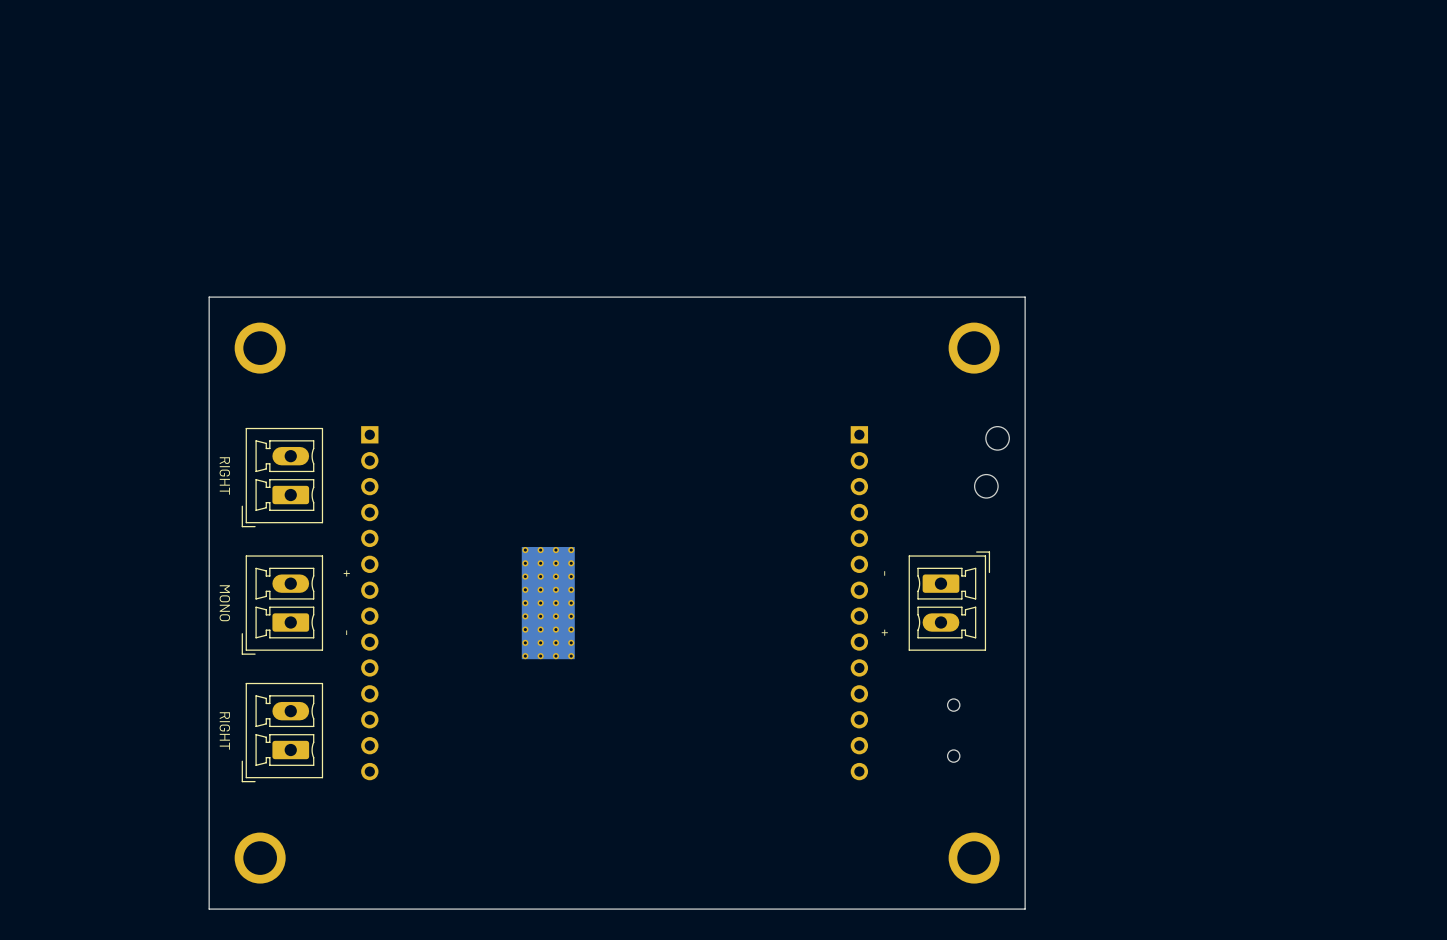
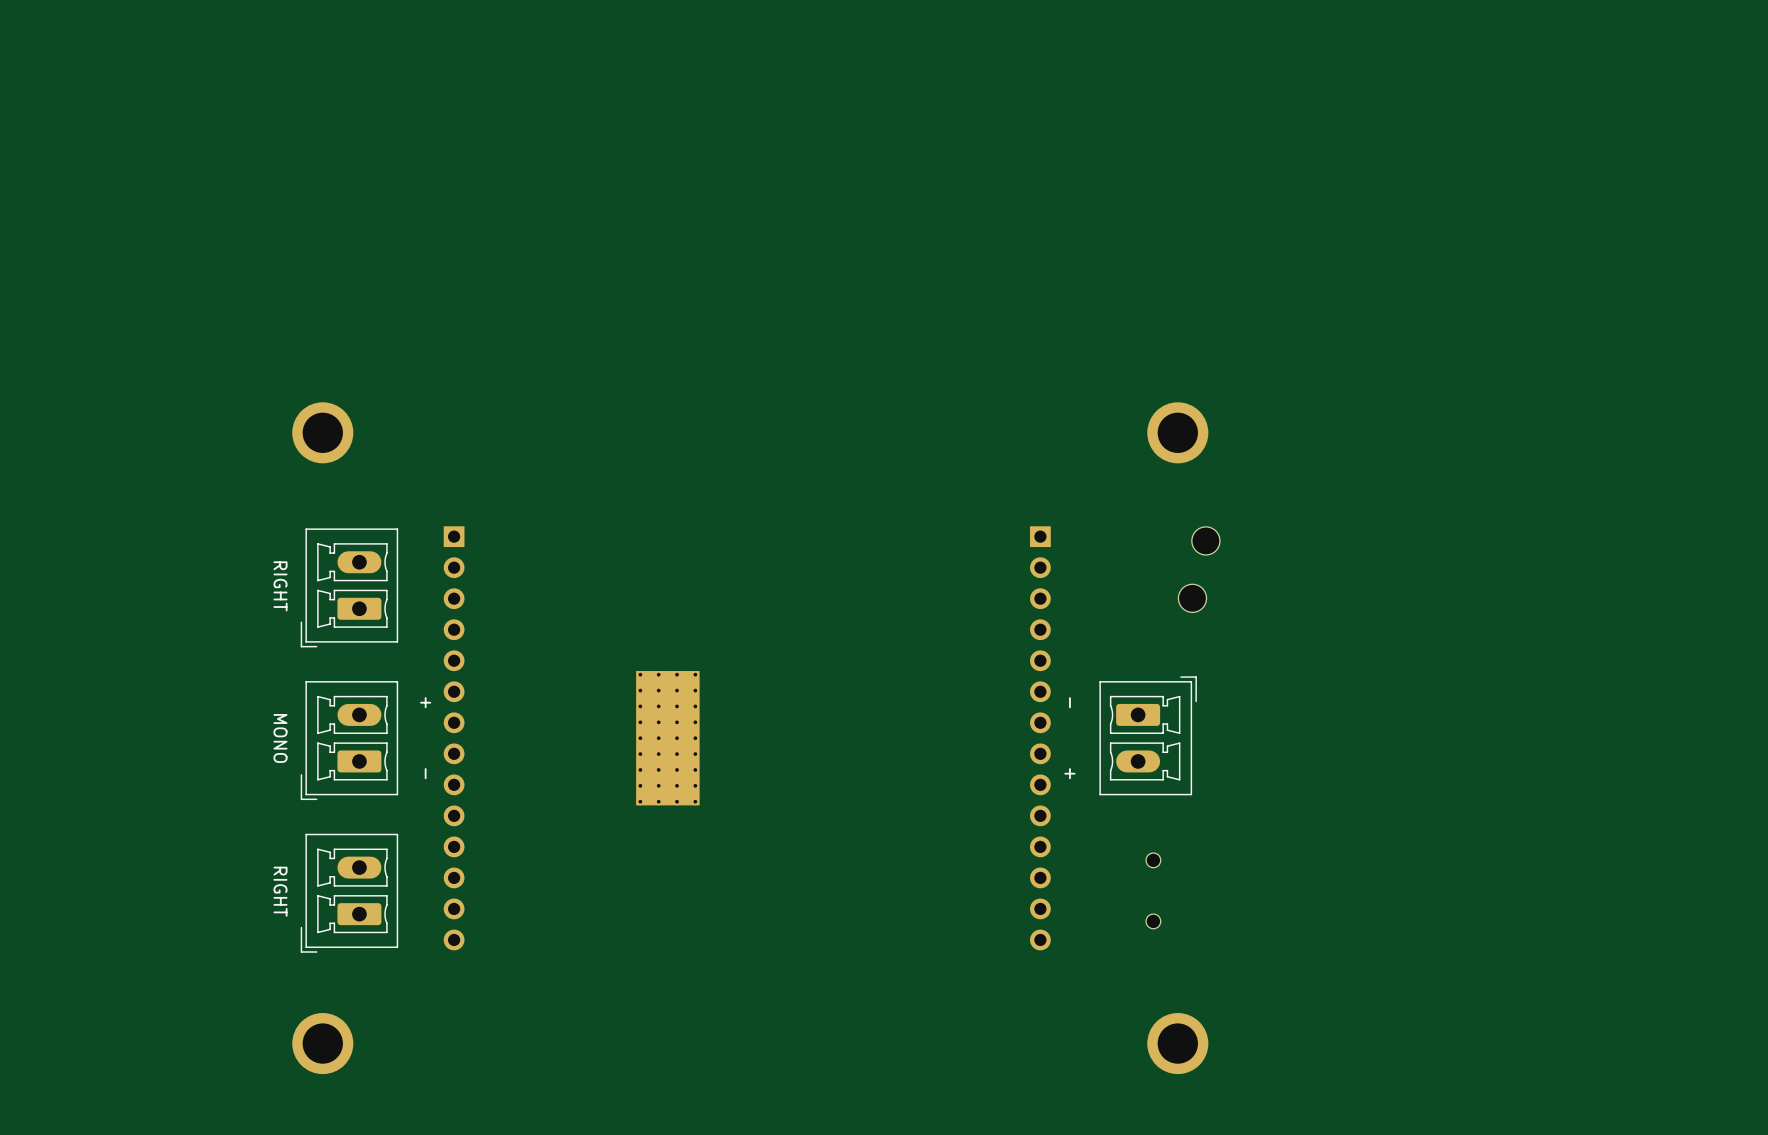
board edge: (1025, 297) (1025, 909) (209, 909) (209, 297) (1025, 297) -> none

